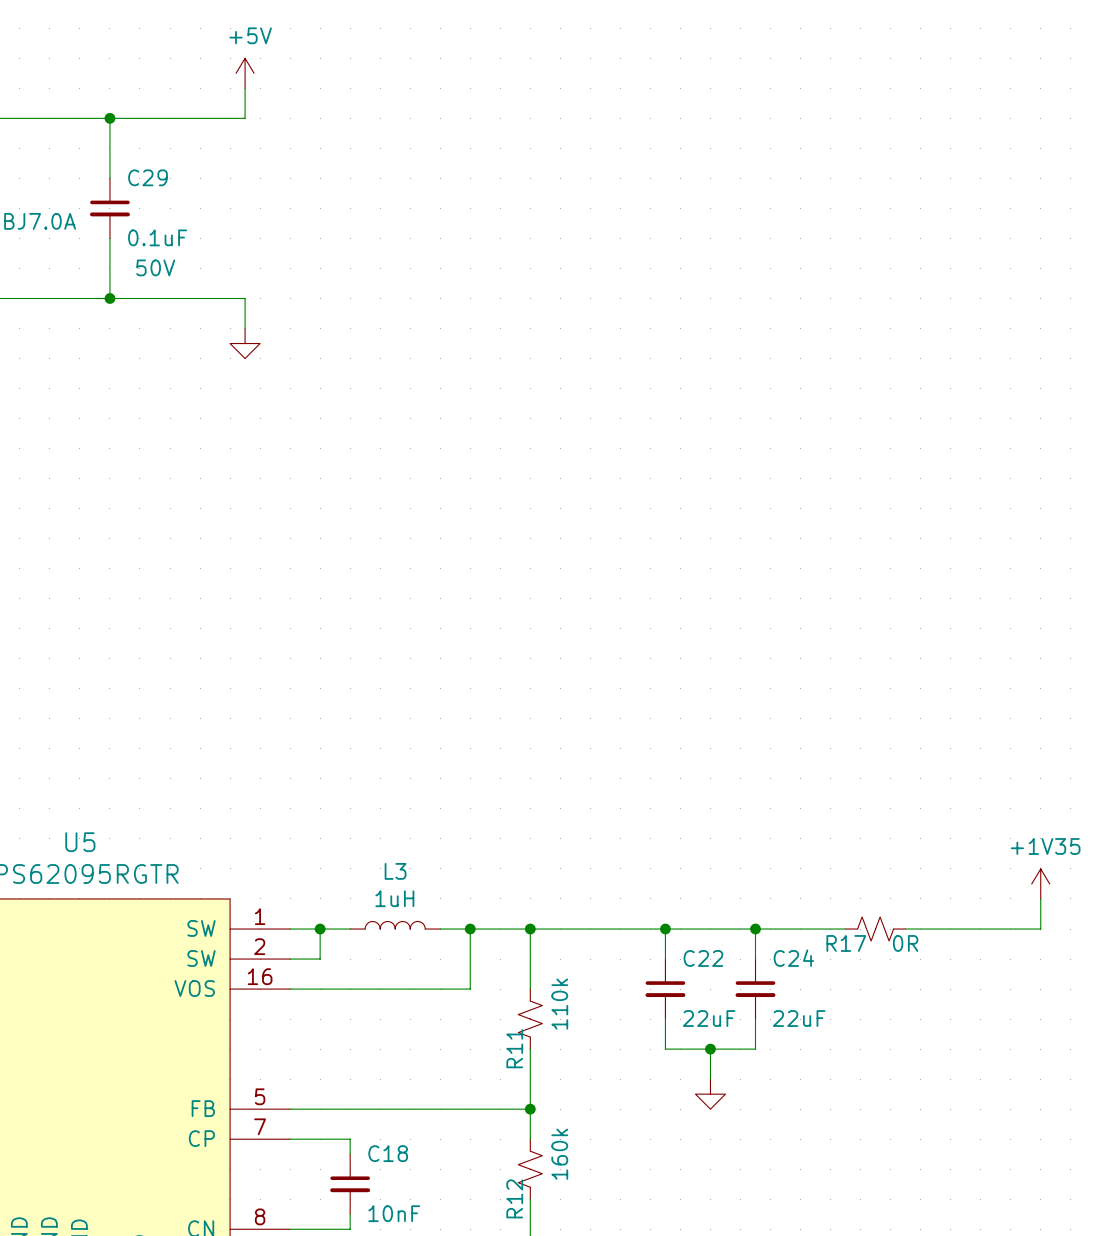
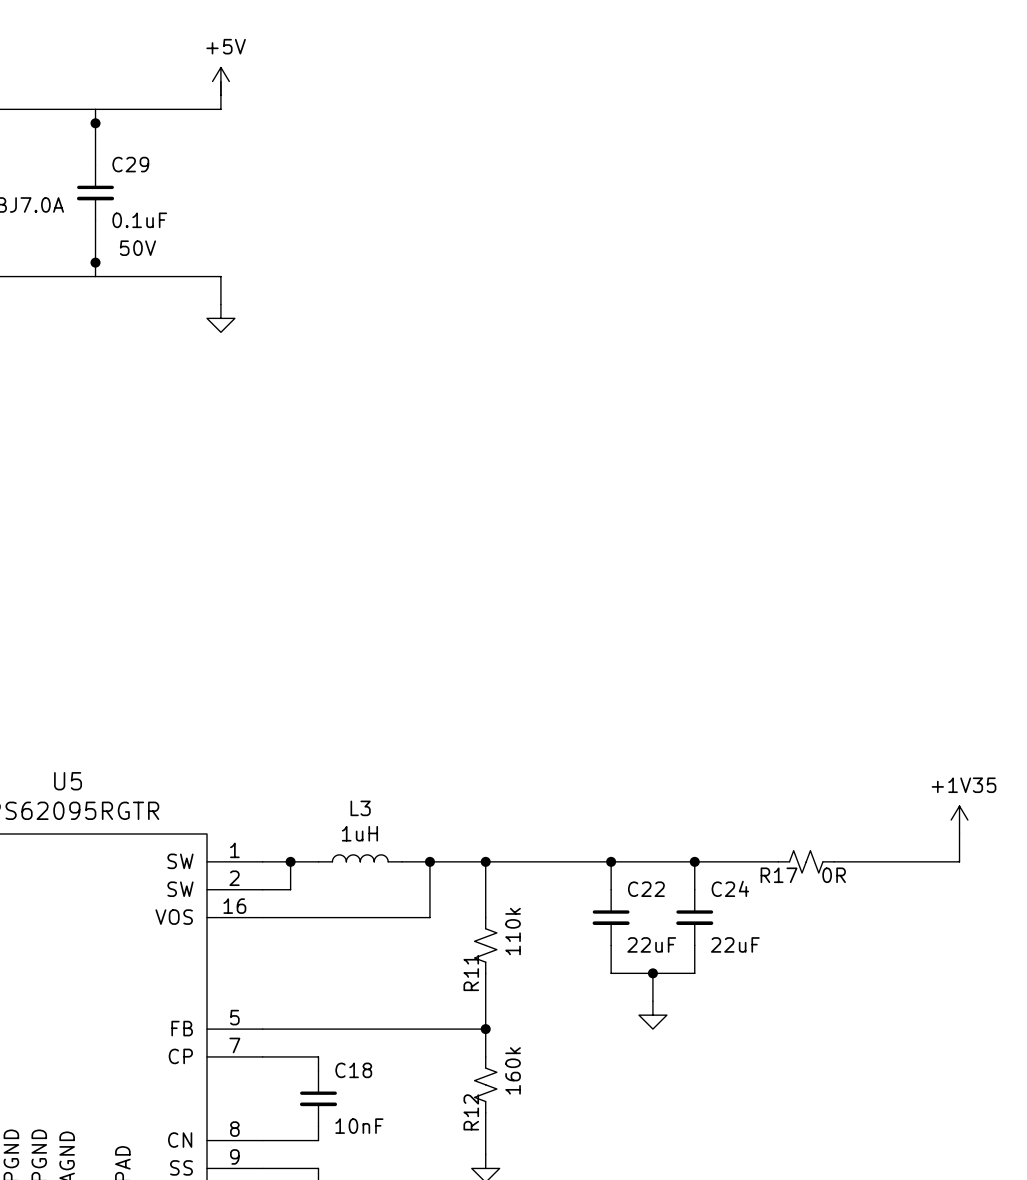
power symbol position: +5V (245, 73) -> +5V (220, 81)
junction position: (109, 118) -> (95, 123)
junction position: (109, 298) -> (95, 262)

